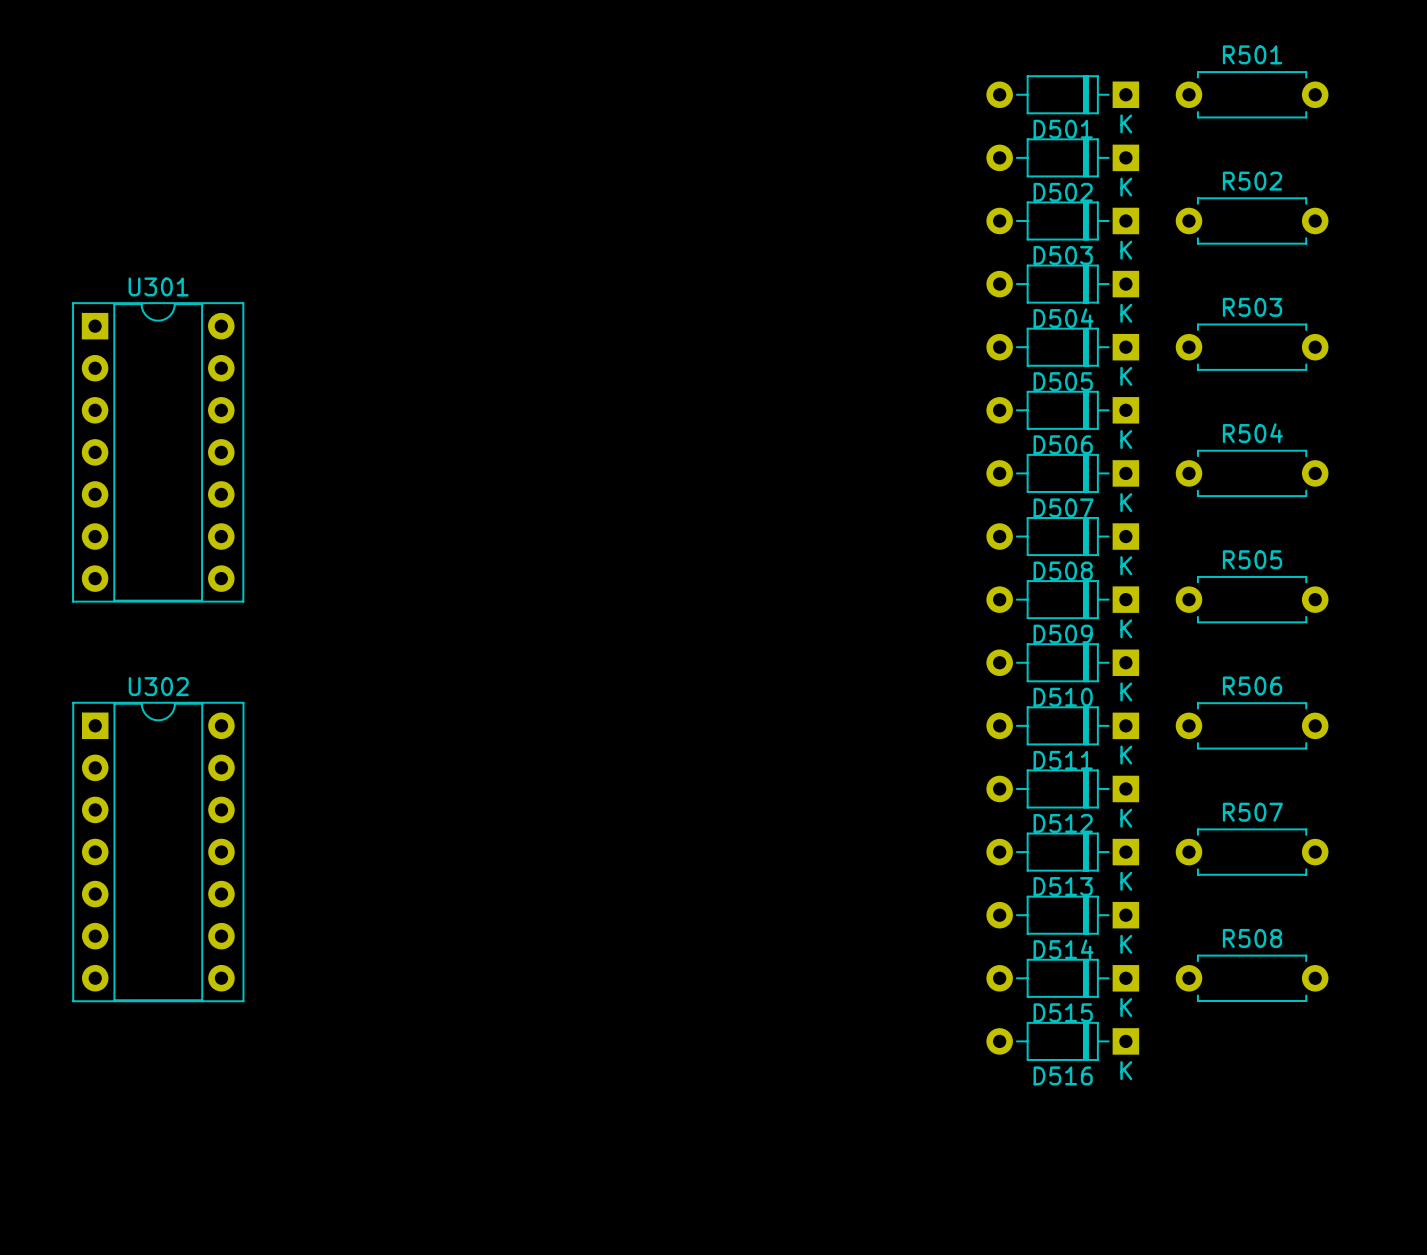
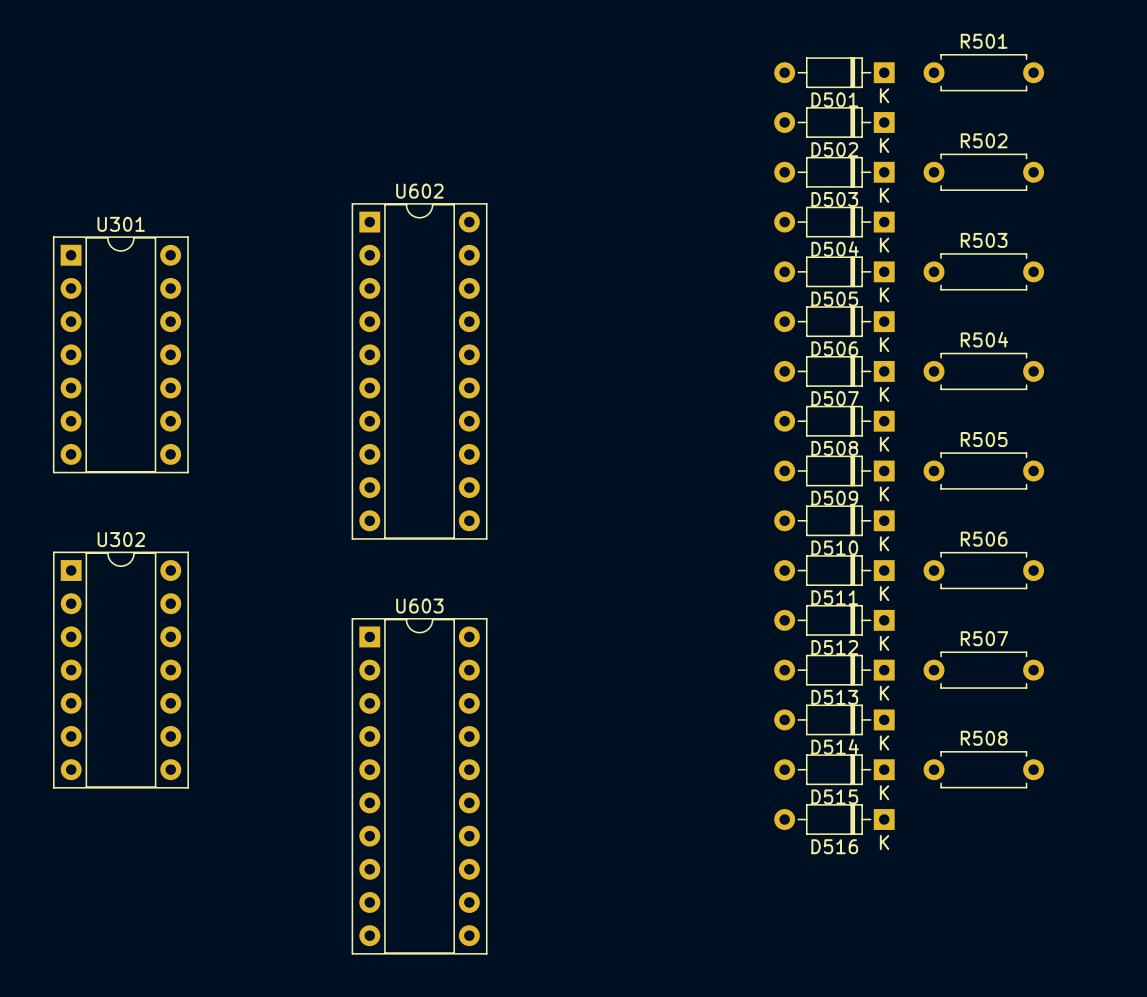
U602: none -> (419, 371)
U603: none -> (419, 786)

